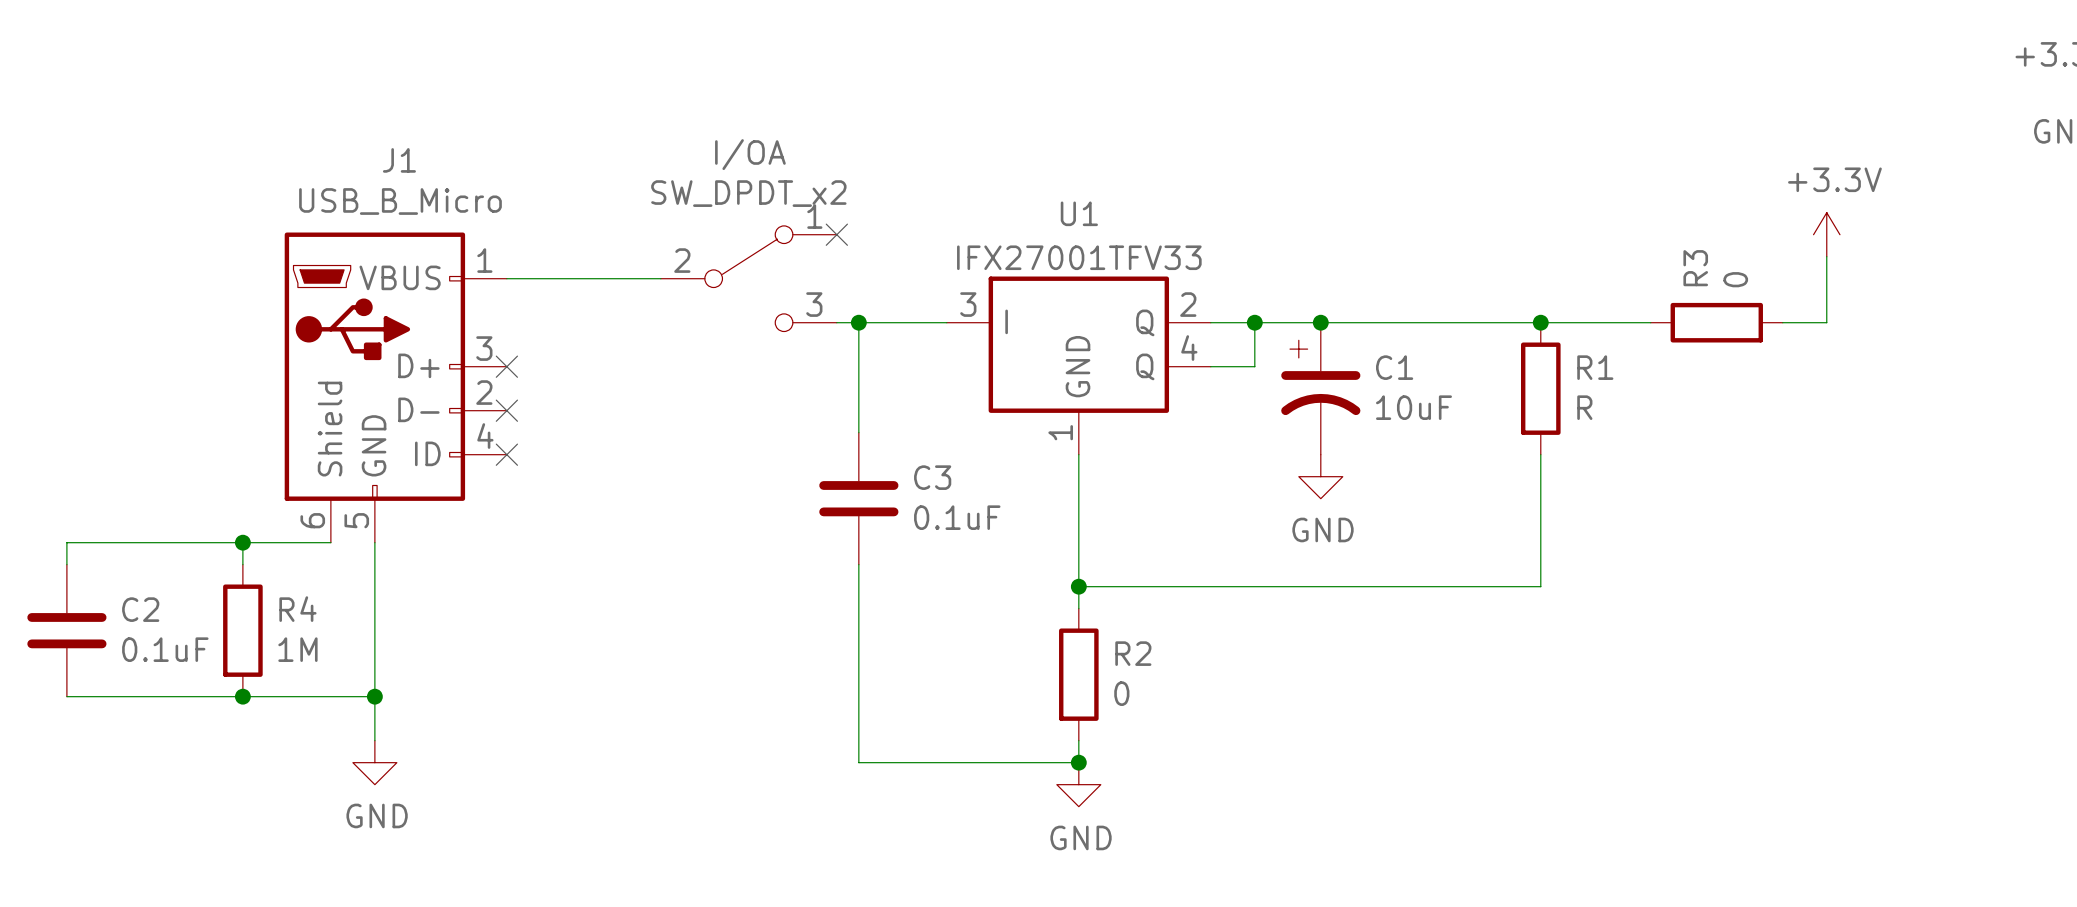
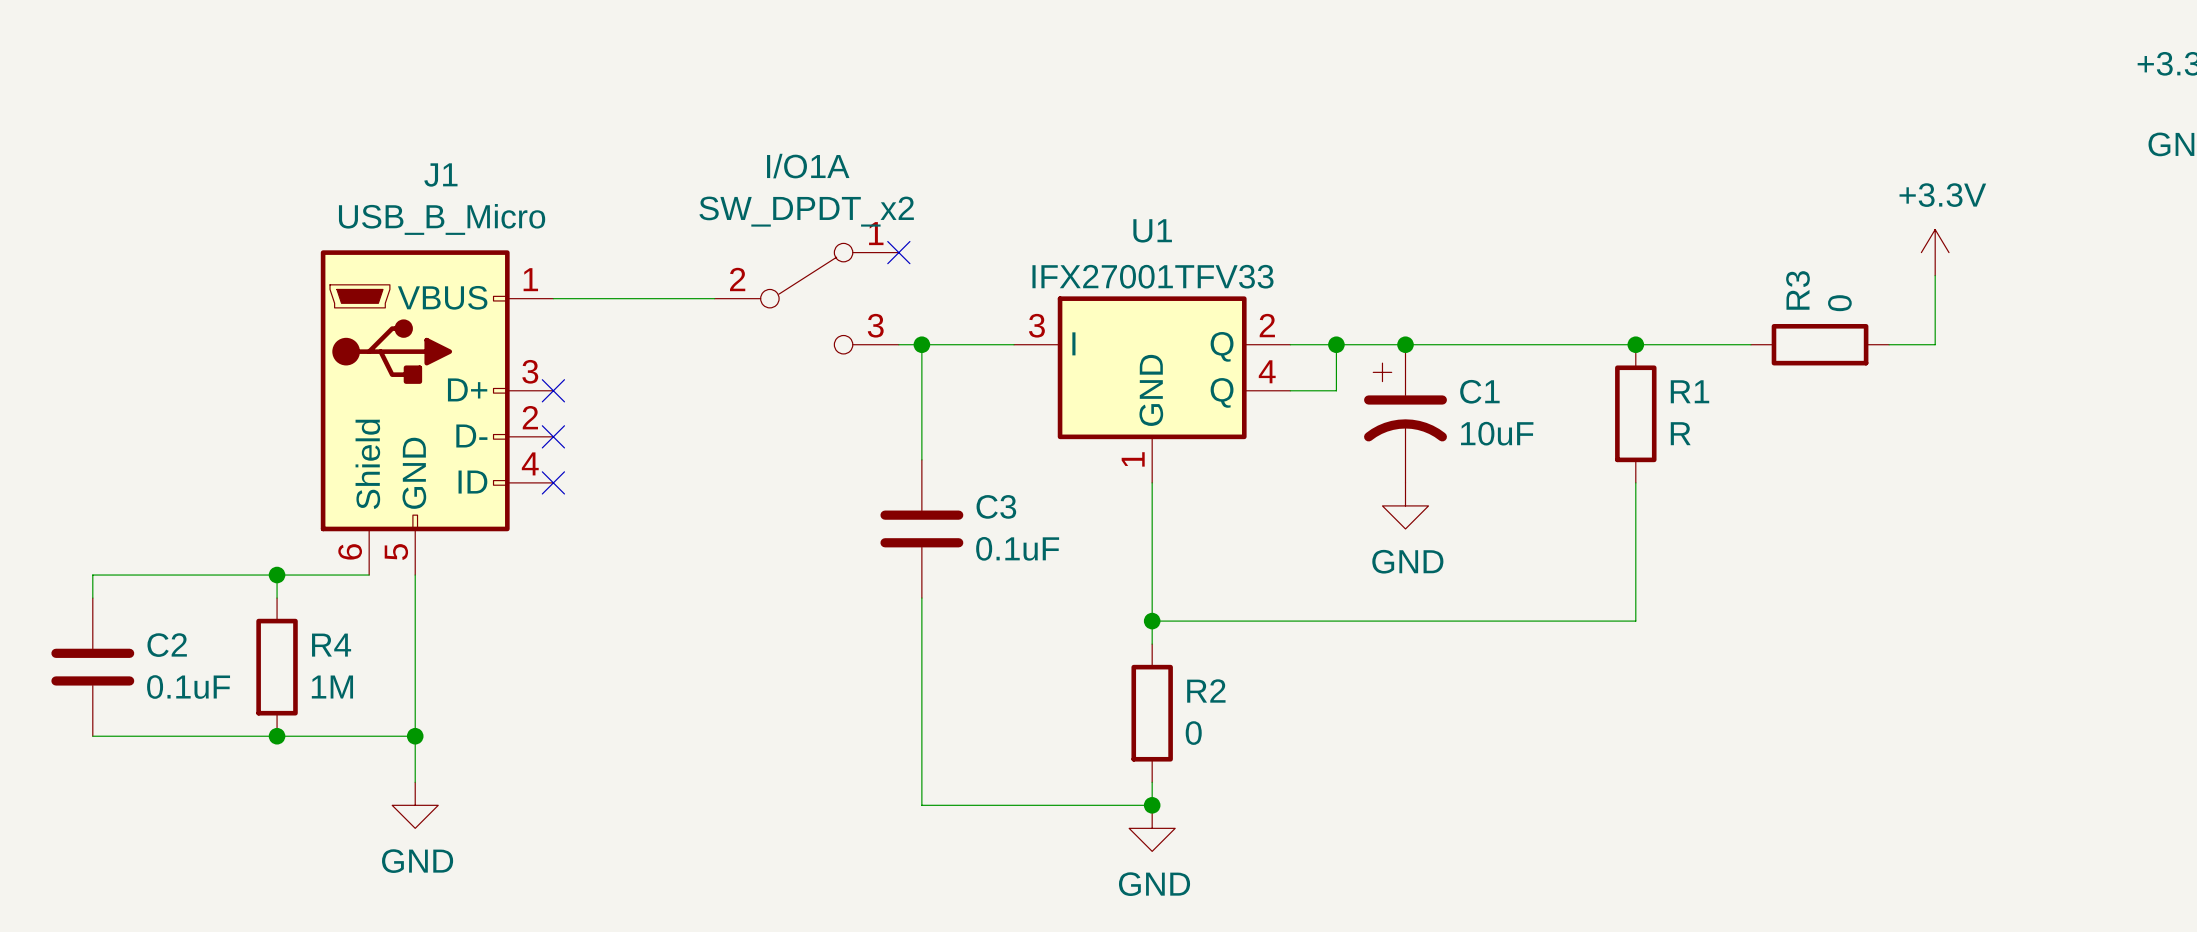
I/OA name: I/OA (750, 154) -> I/O1A (808, 166)

